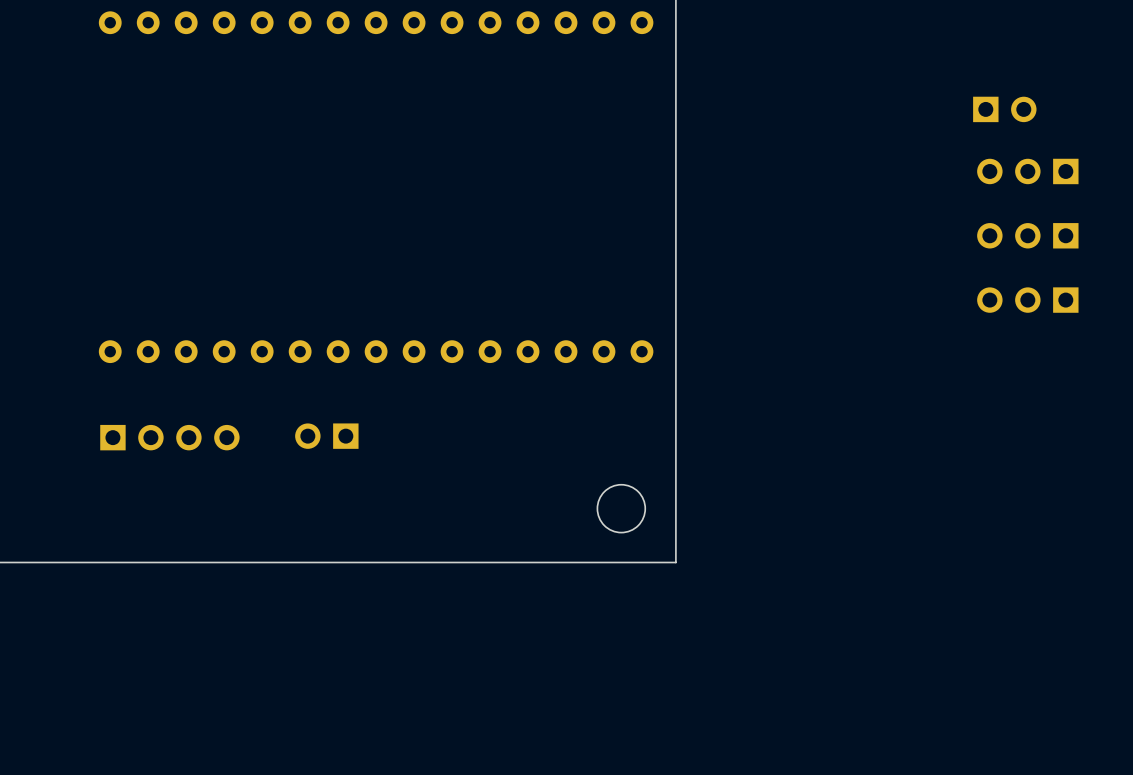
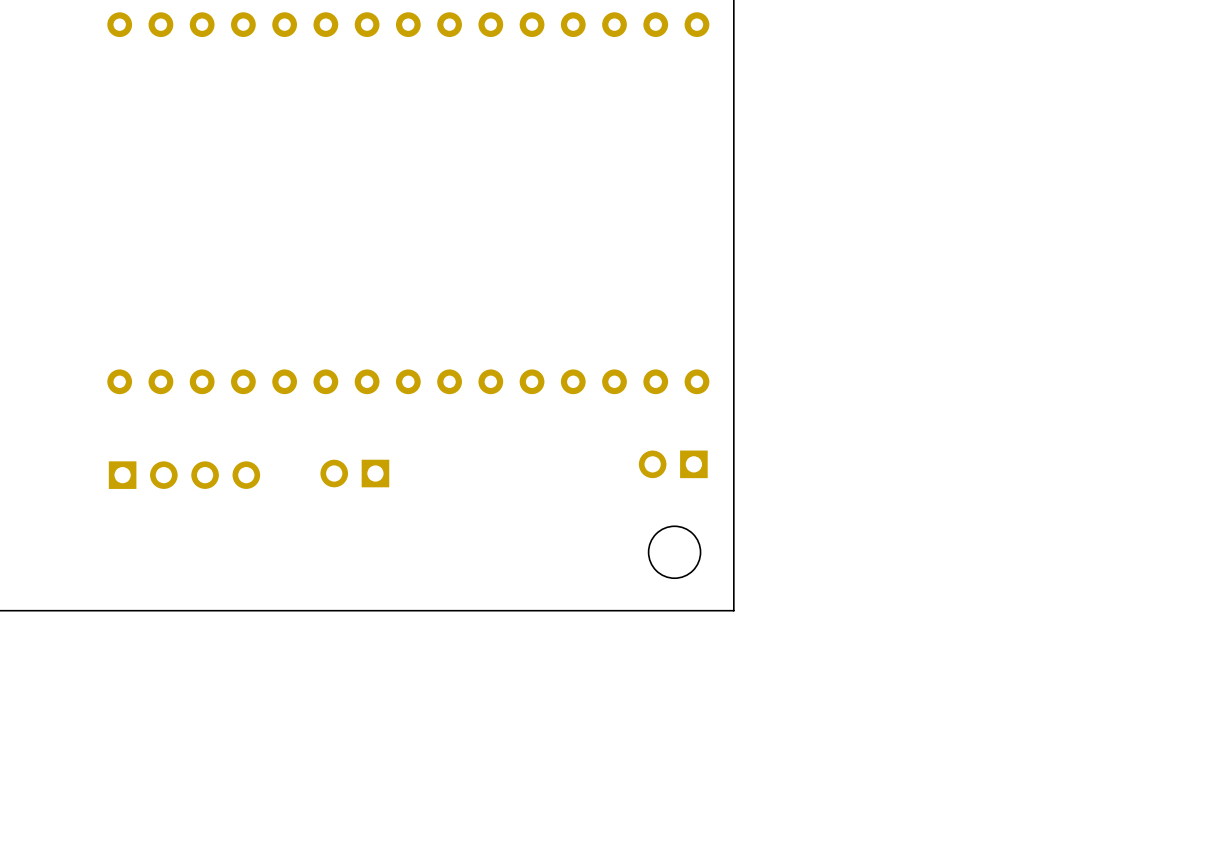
part: (1004, 109) -> none
part: (1027, 171) -> none
part: (1027, 235) -> none
part: (1027, 300) -> none
part: none -> (673, 464)

